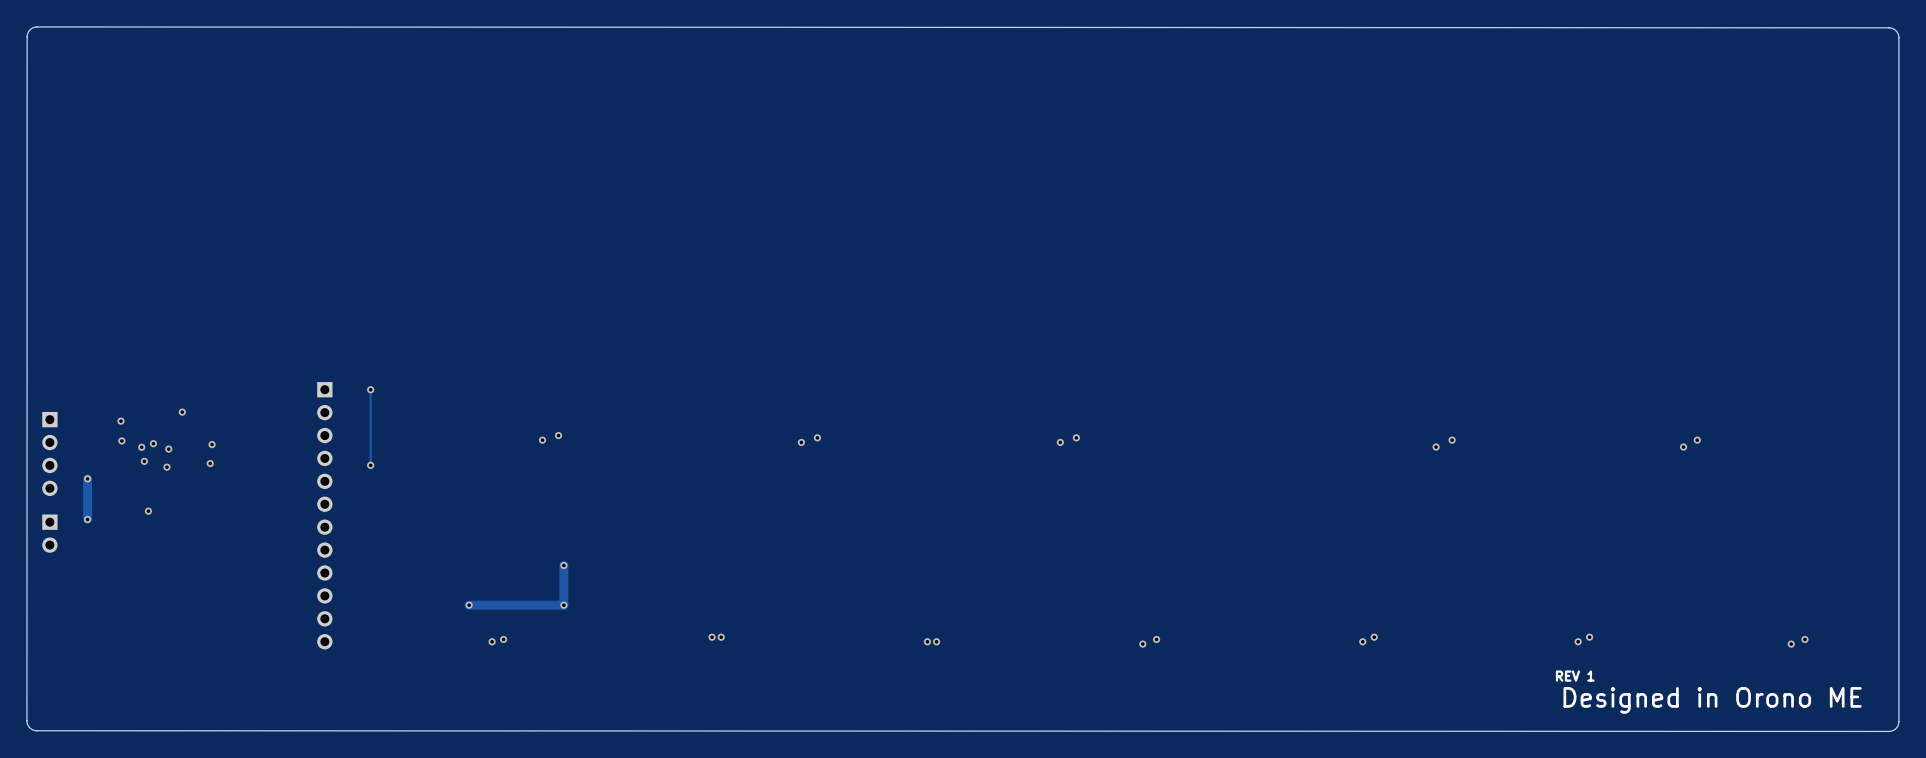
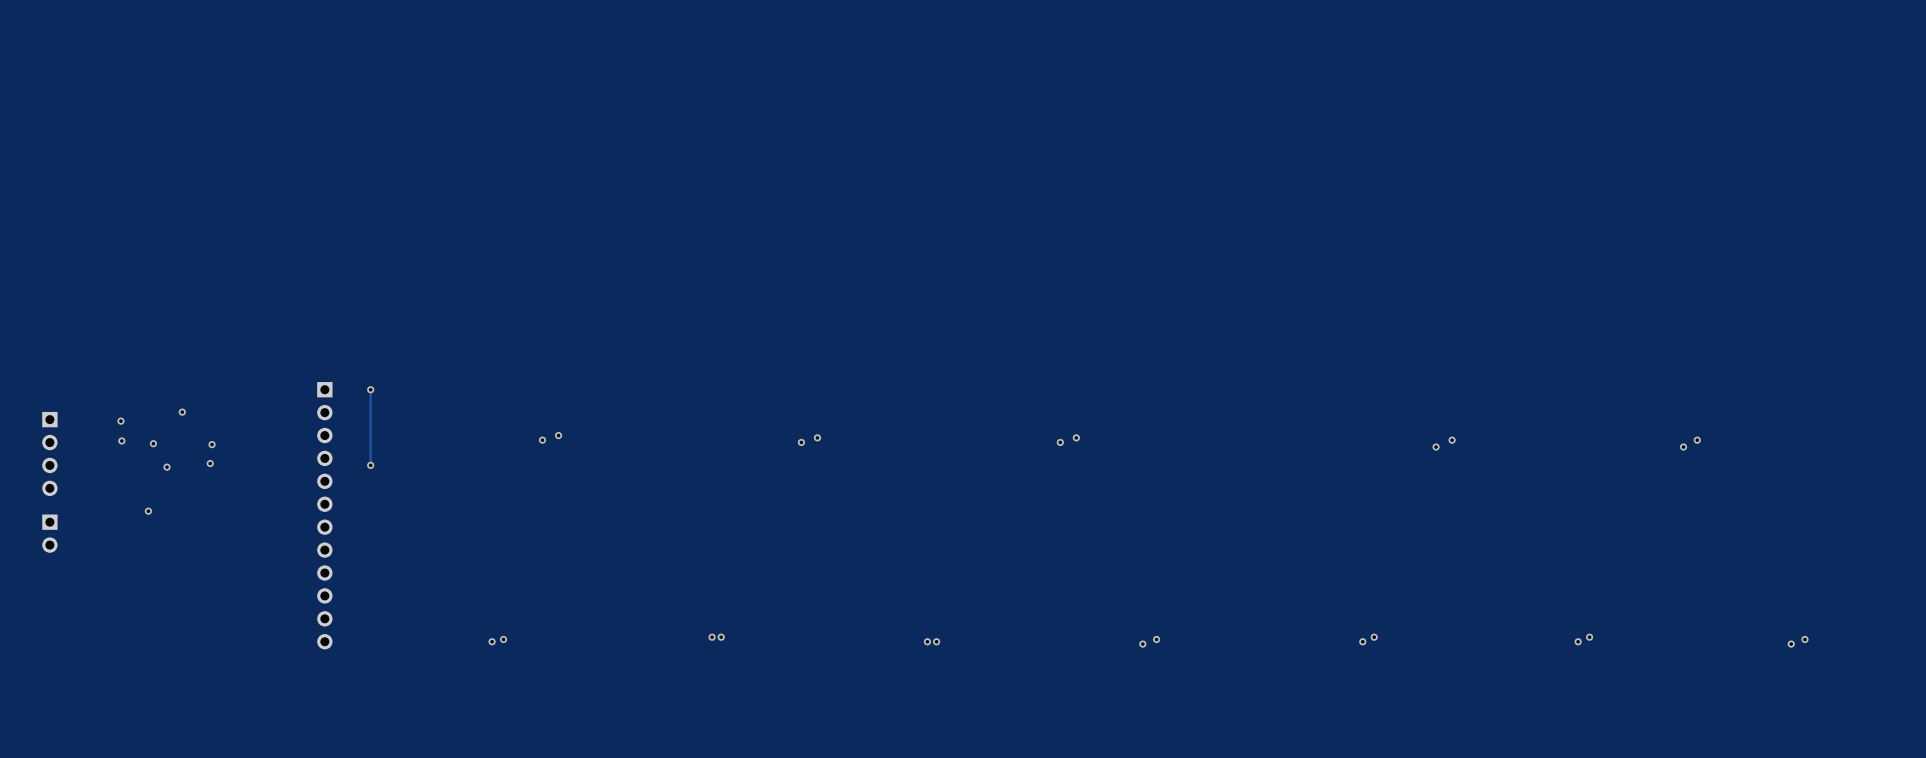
board edge: (37, 26) (1892, 28) (1897, 32) (1898, 37) (1898, 725) (1895, 729) (1888, 731) (33, 729) (28, 725) (26, 720) (27, 36) (30, 29) (37, 26) -> none
via: (141, 447) -> none
via: (168, 449) -> none
via: (144, 461) -> none
track: (87, 478) (87, 519) -> none
via: (87, 478) -> none
via: (87, 519) -> none
track: (563, 565) (563, 605) (469, 605) -> none
via: (563, 565) -> none
via: (469, 605) -> none
via: (563, 605) -> none
text: REV 1 (1575, 676) -> none
text: Designed in Orono ME (1712, 700) -> none

